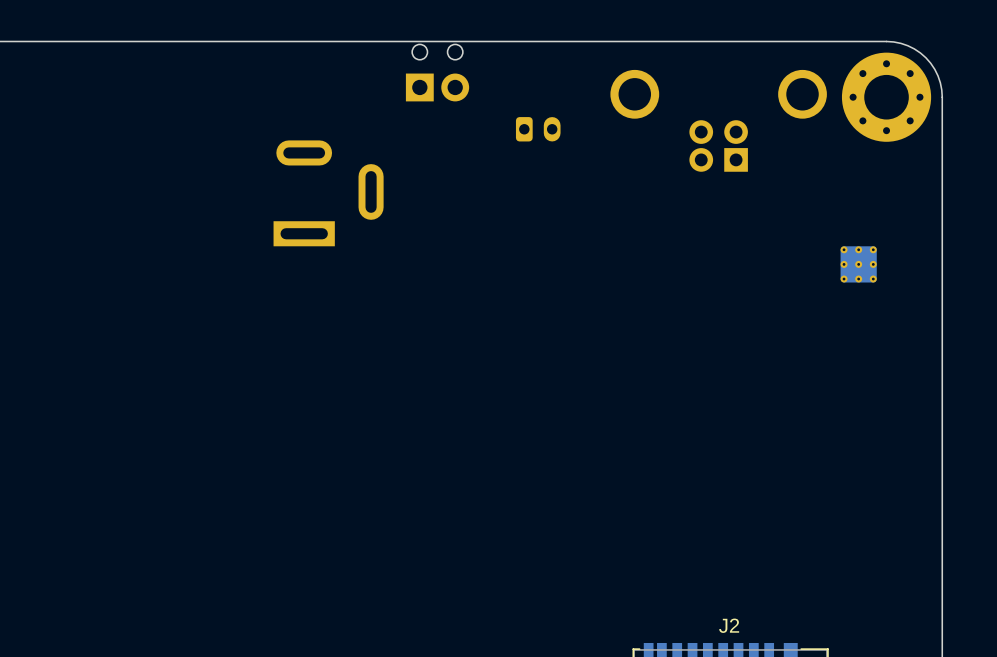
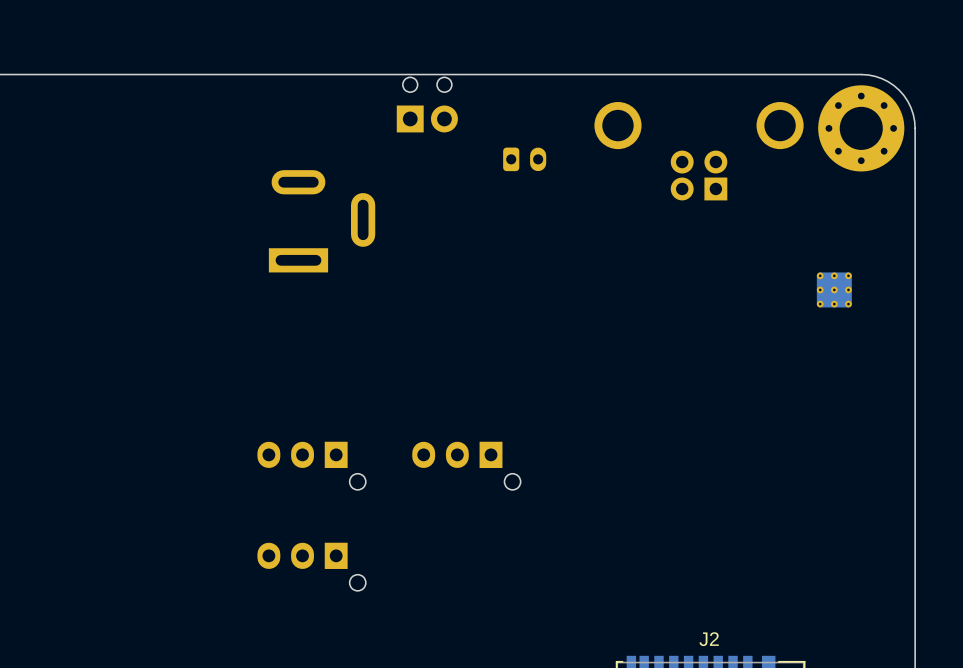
part: none -> (311, 465)
part: none -> (466, 465)
part: none -> (311, 566)

